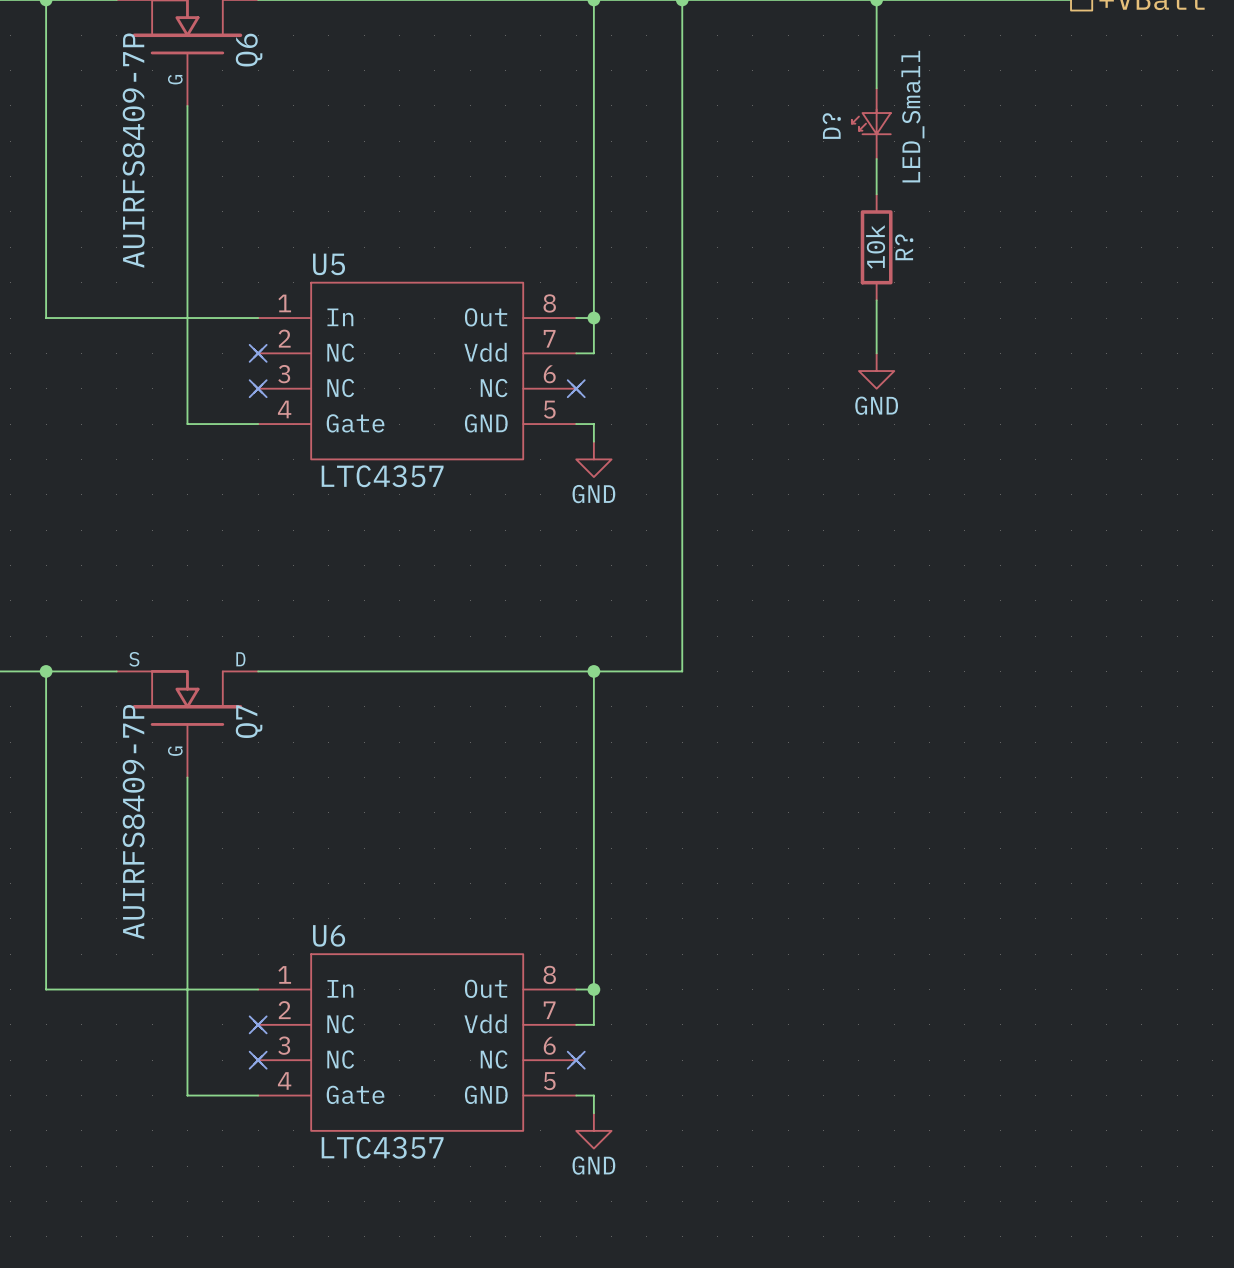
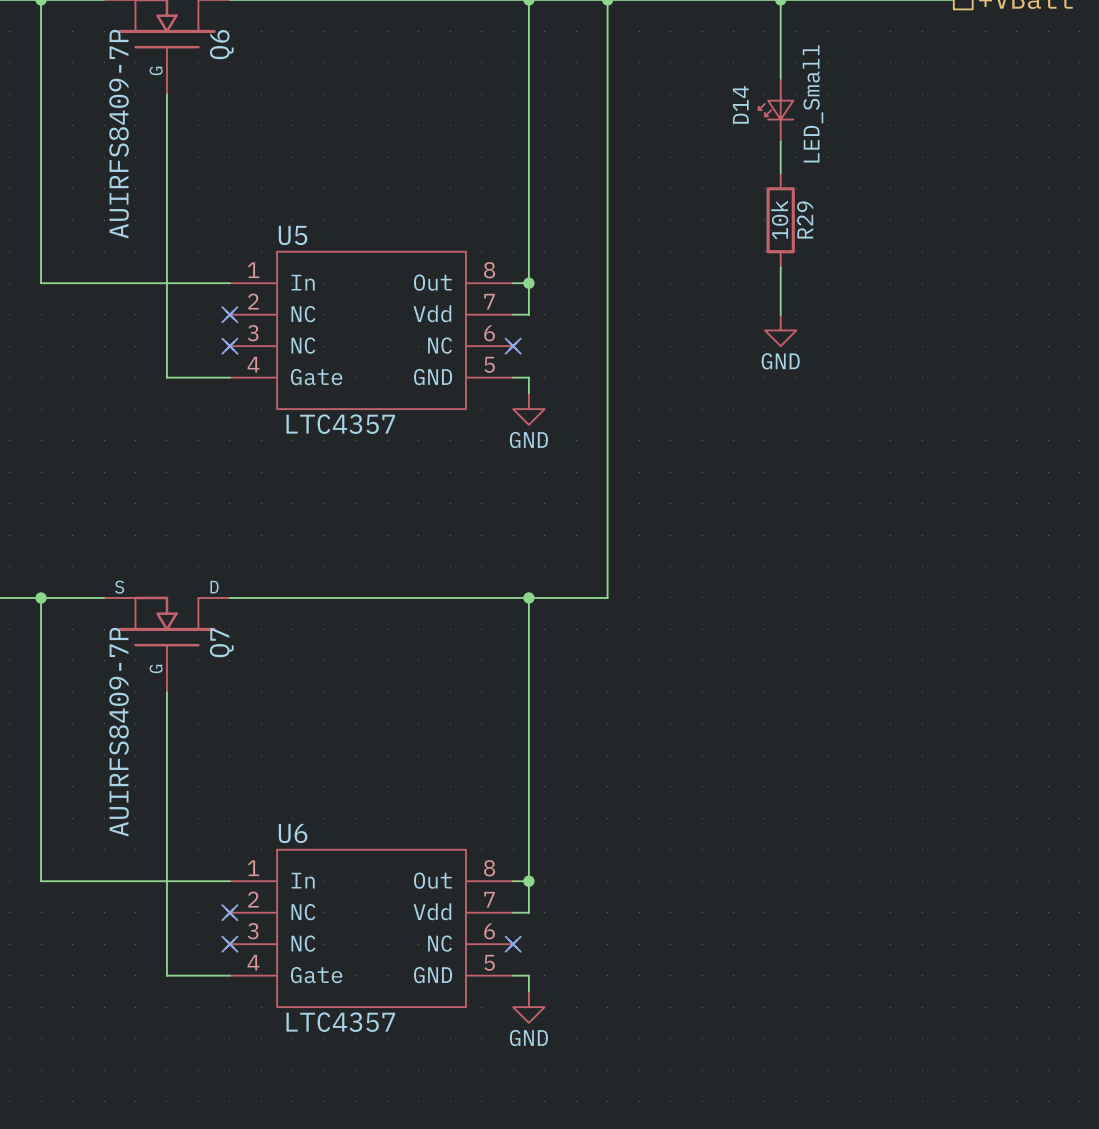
D? name: D? (831, 126) -> D14 (740, 104)
R? name: R? (904, 247) -> R29 (805, 219)

